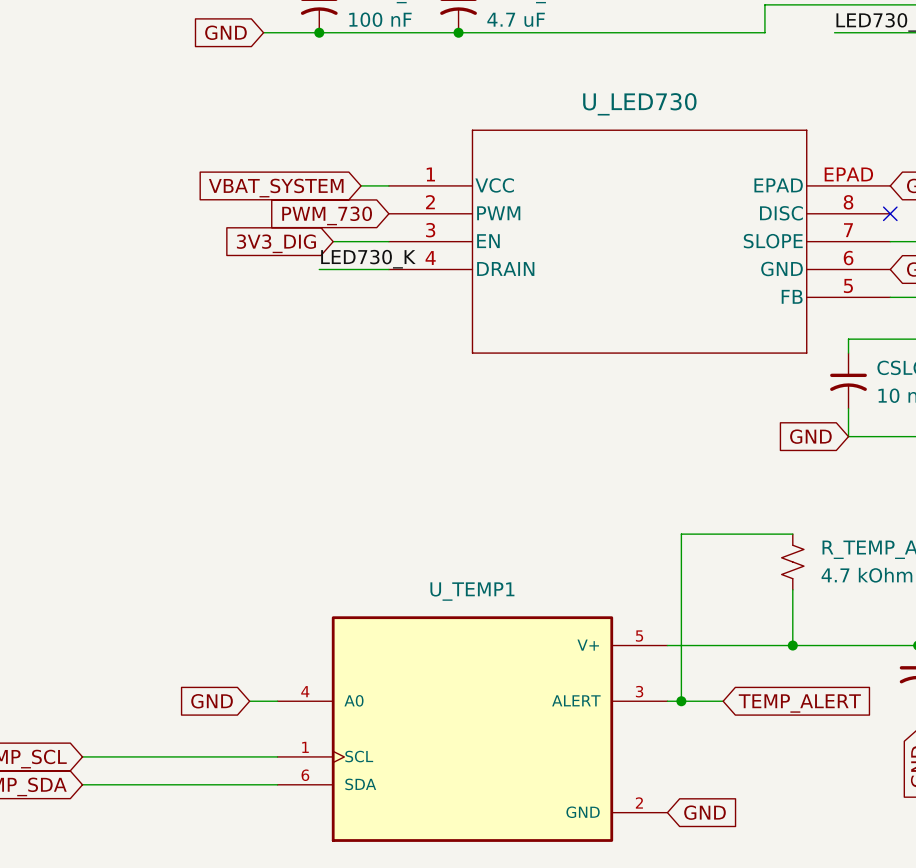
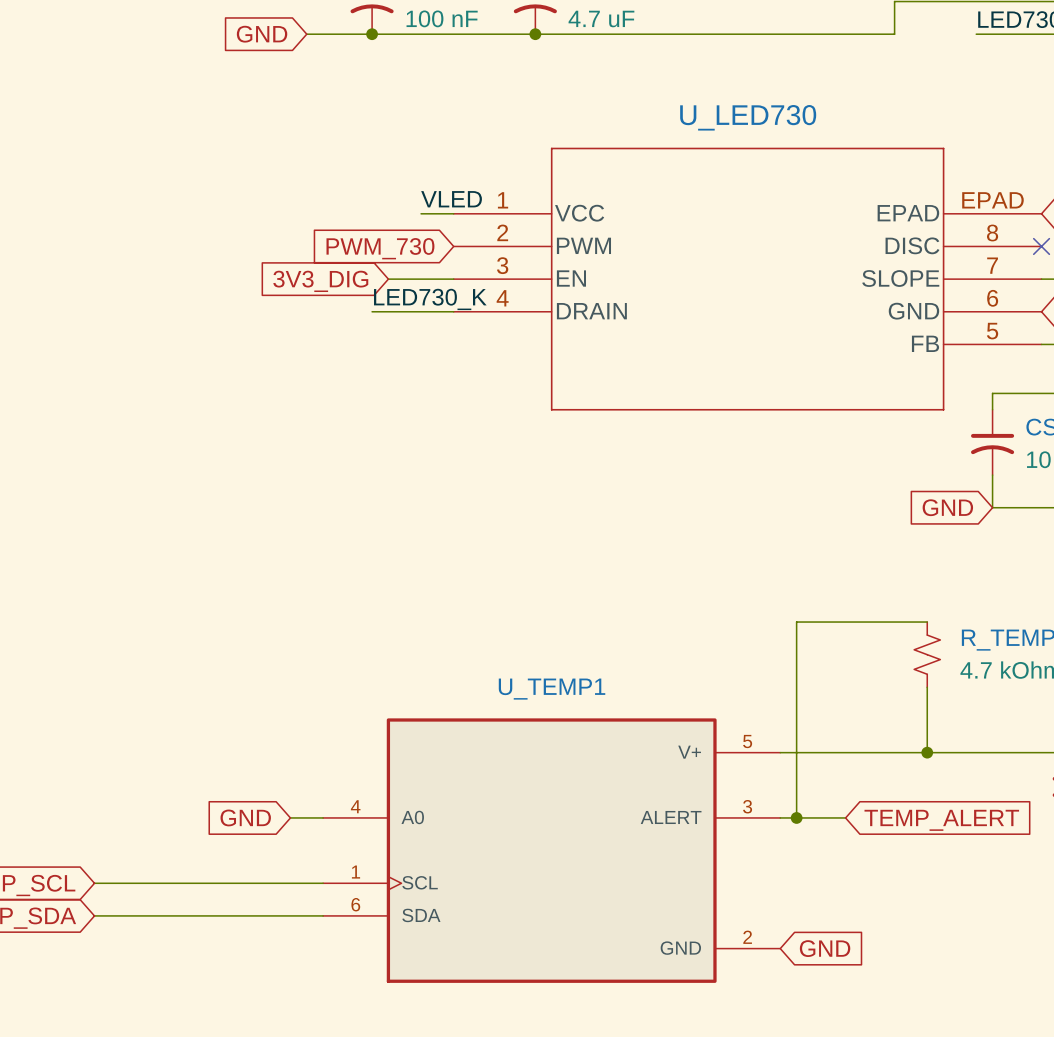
label: none -> VLED (451, 199)
global label: VBAT_SYSTEM (276, 188) -> none

